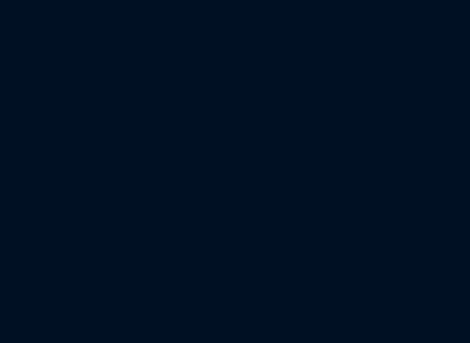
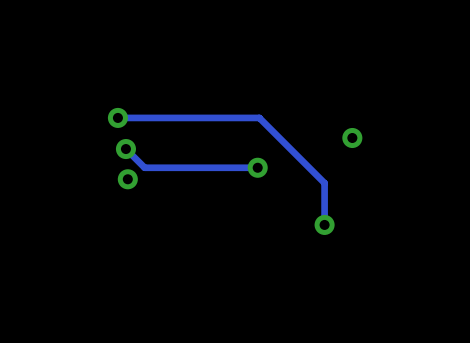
track: none -> (117, 117) (259, 117) (324, 183) (324, 224)
via: none -> (117, 117)
via: none -> (352, 137)
track: none -> (125, 149) (144, 167) (257, 167)
via: none -> (125, 149)
via: none -> (257, 167)
via: none -> (127, 179)
via: none -> (324, 224)

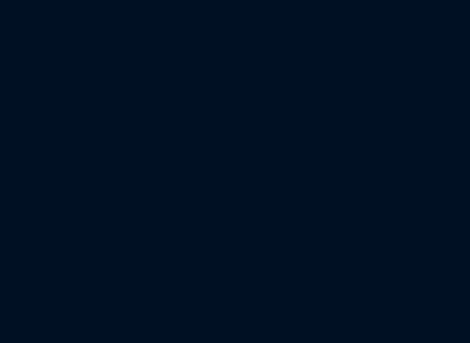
track: (117, 117) (259, 117) (324, 183) (324, 224) -> none
via: (117, 117) -> none
via: (352, 137) -> none
track: (125, 149) (144, 167) (257, 167) -> none
via: (125, 149) -> none
via: (257, 167) -> none
via: (127, 179) -> none
via: (324, 224) -> none

